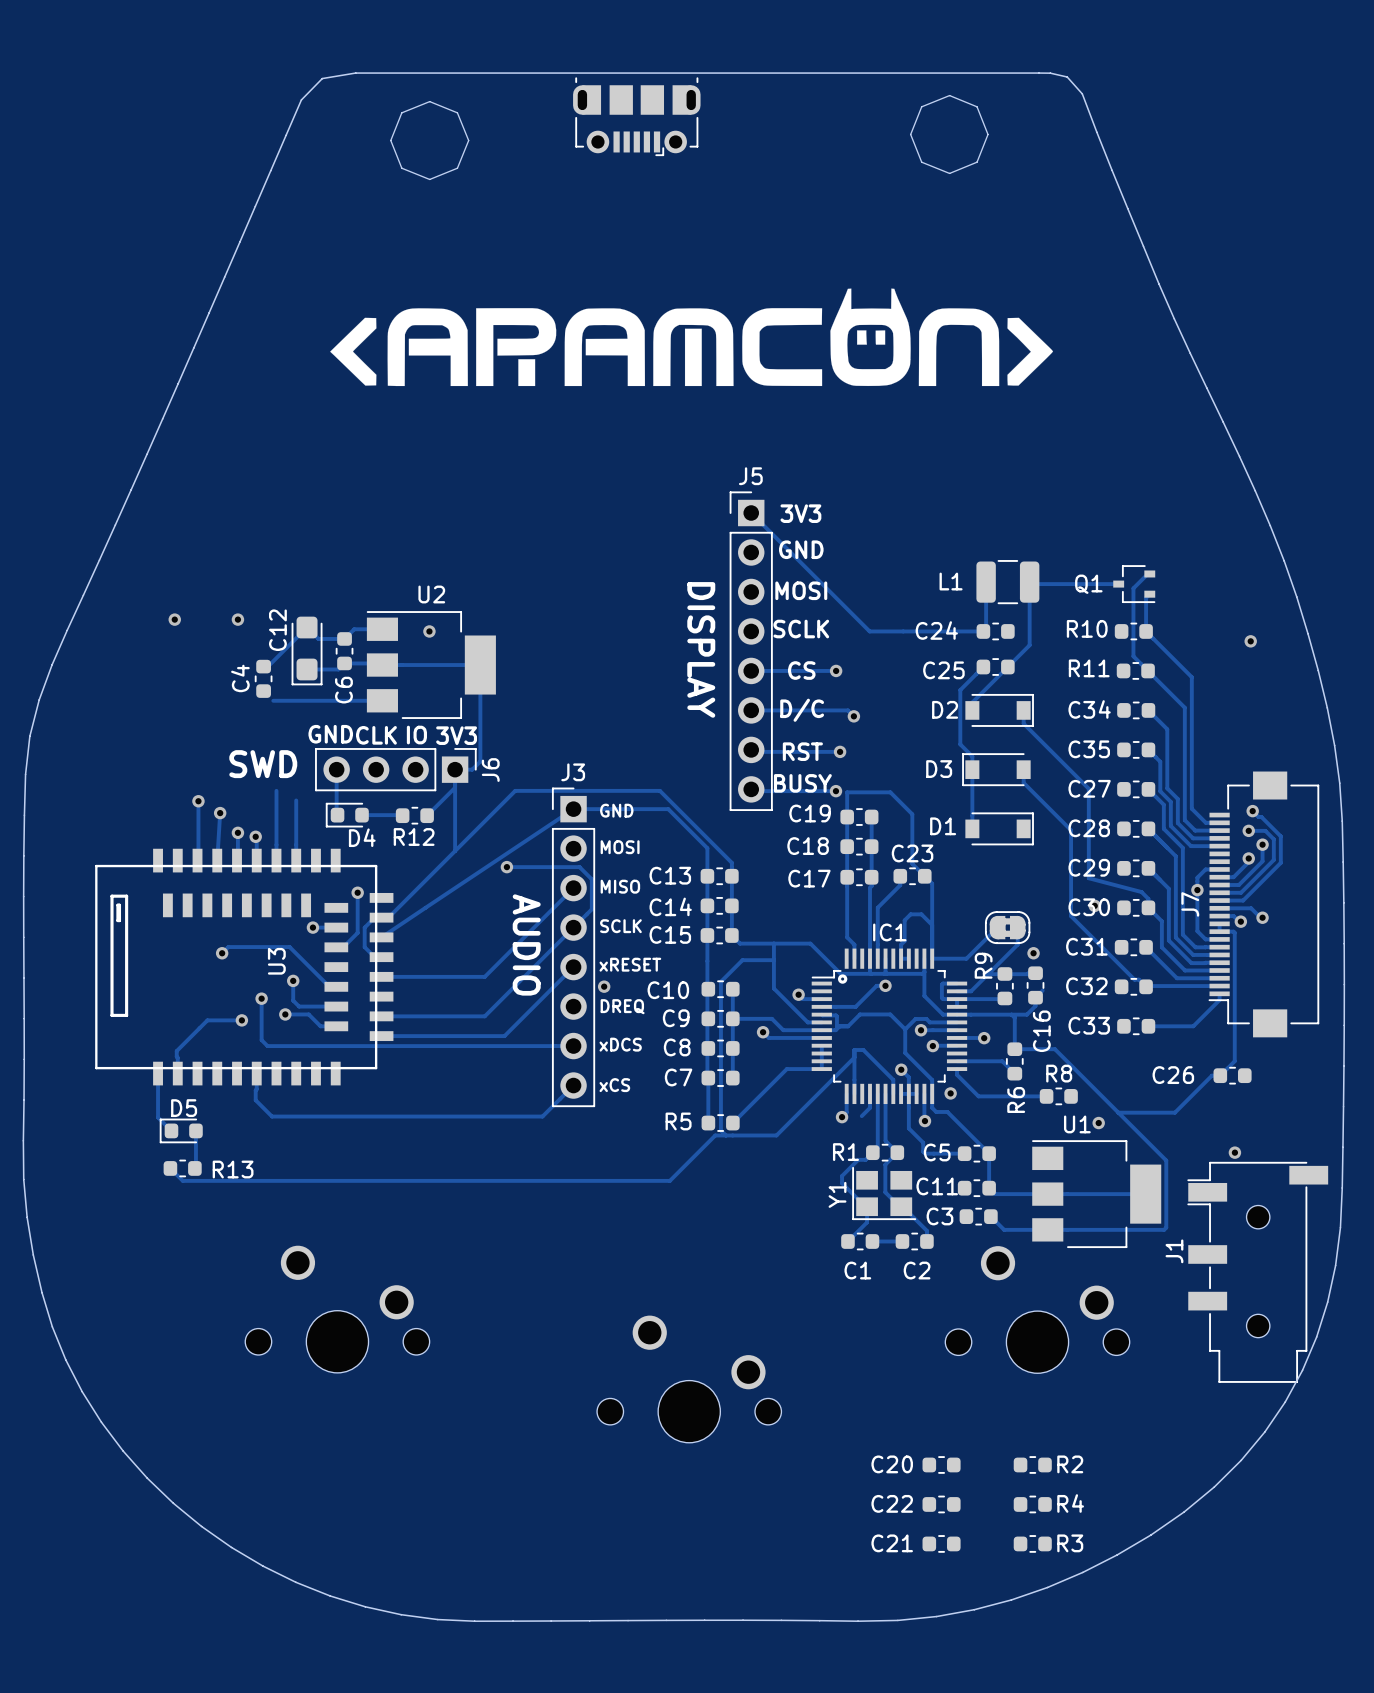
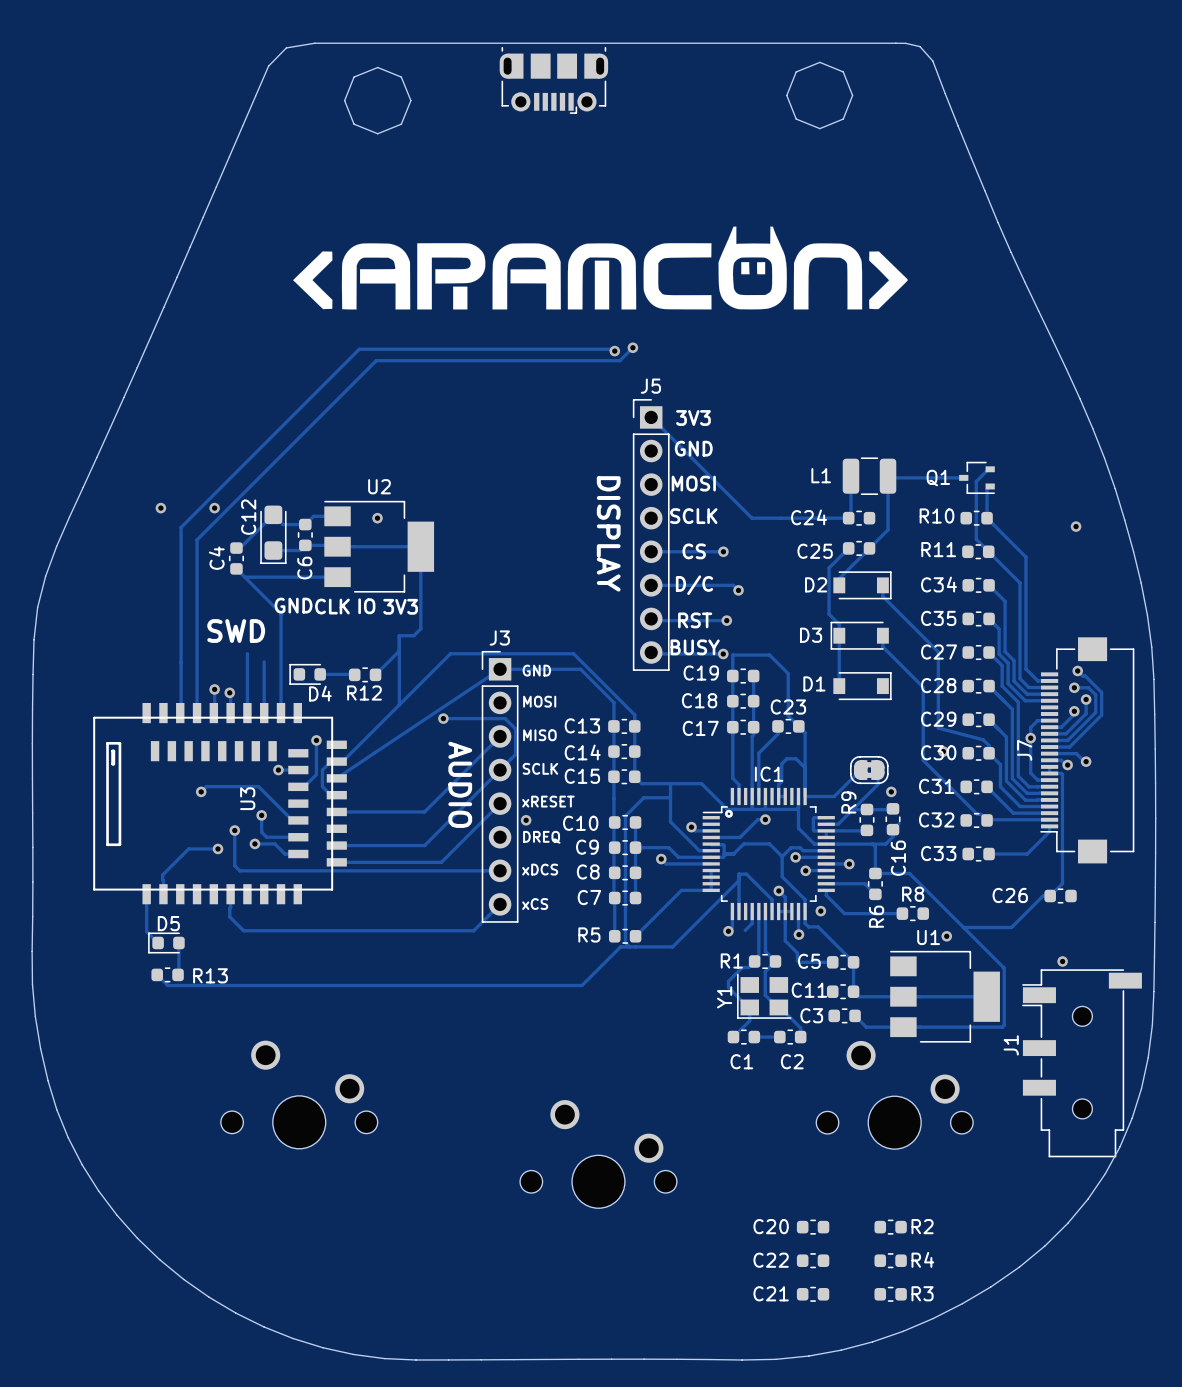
via: none -> (632, 347)
track: none -> (614, 351) (612, 349) (359, 349) (181, 527) (181, 662)
via: none -> (614, 351)
track: none -> (236, 568) (281, 614) (281, 713)
track: (336, 769) (336, 814) -> none
J6: (395, 769) -> none
via: (198, 801) -> none
track: (220, 813) (217, 860) -> (632, 347) (619, 360) (376, 360) (197, 539) (197, 713)
via: (220, 813) -> none

